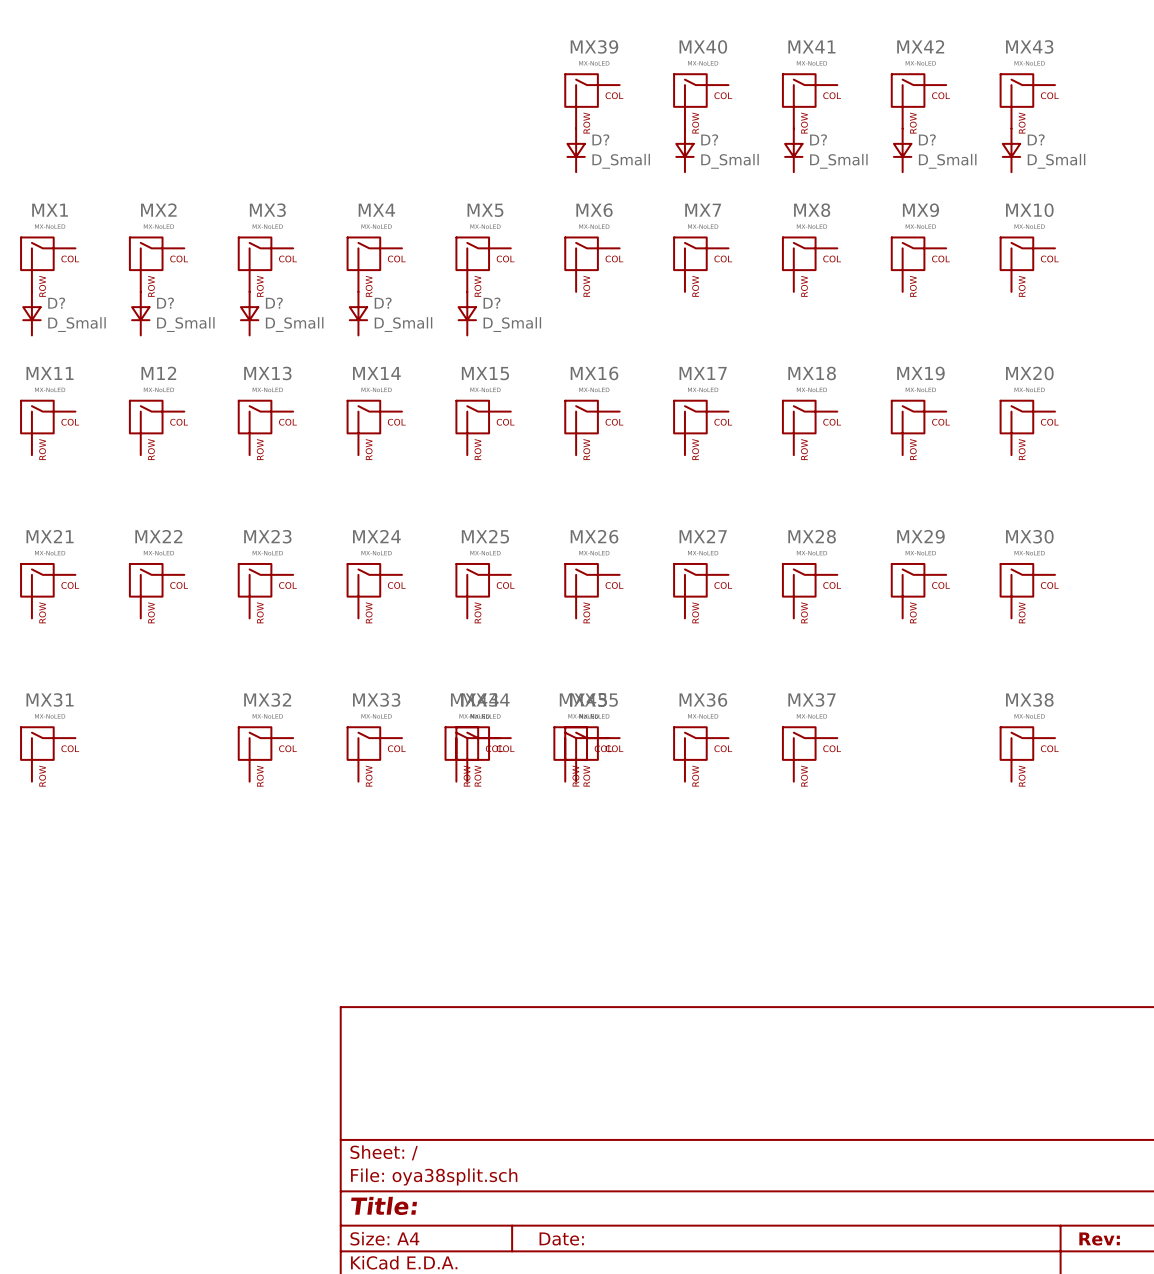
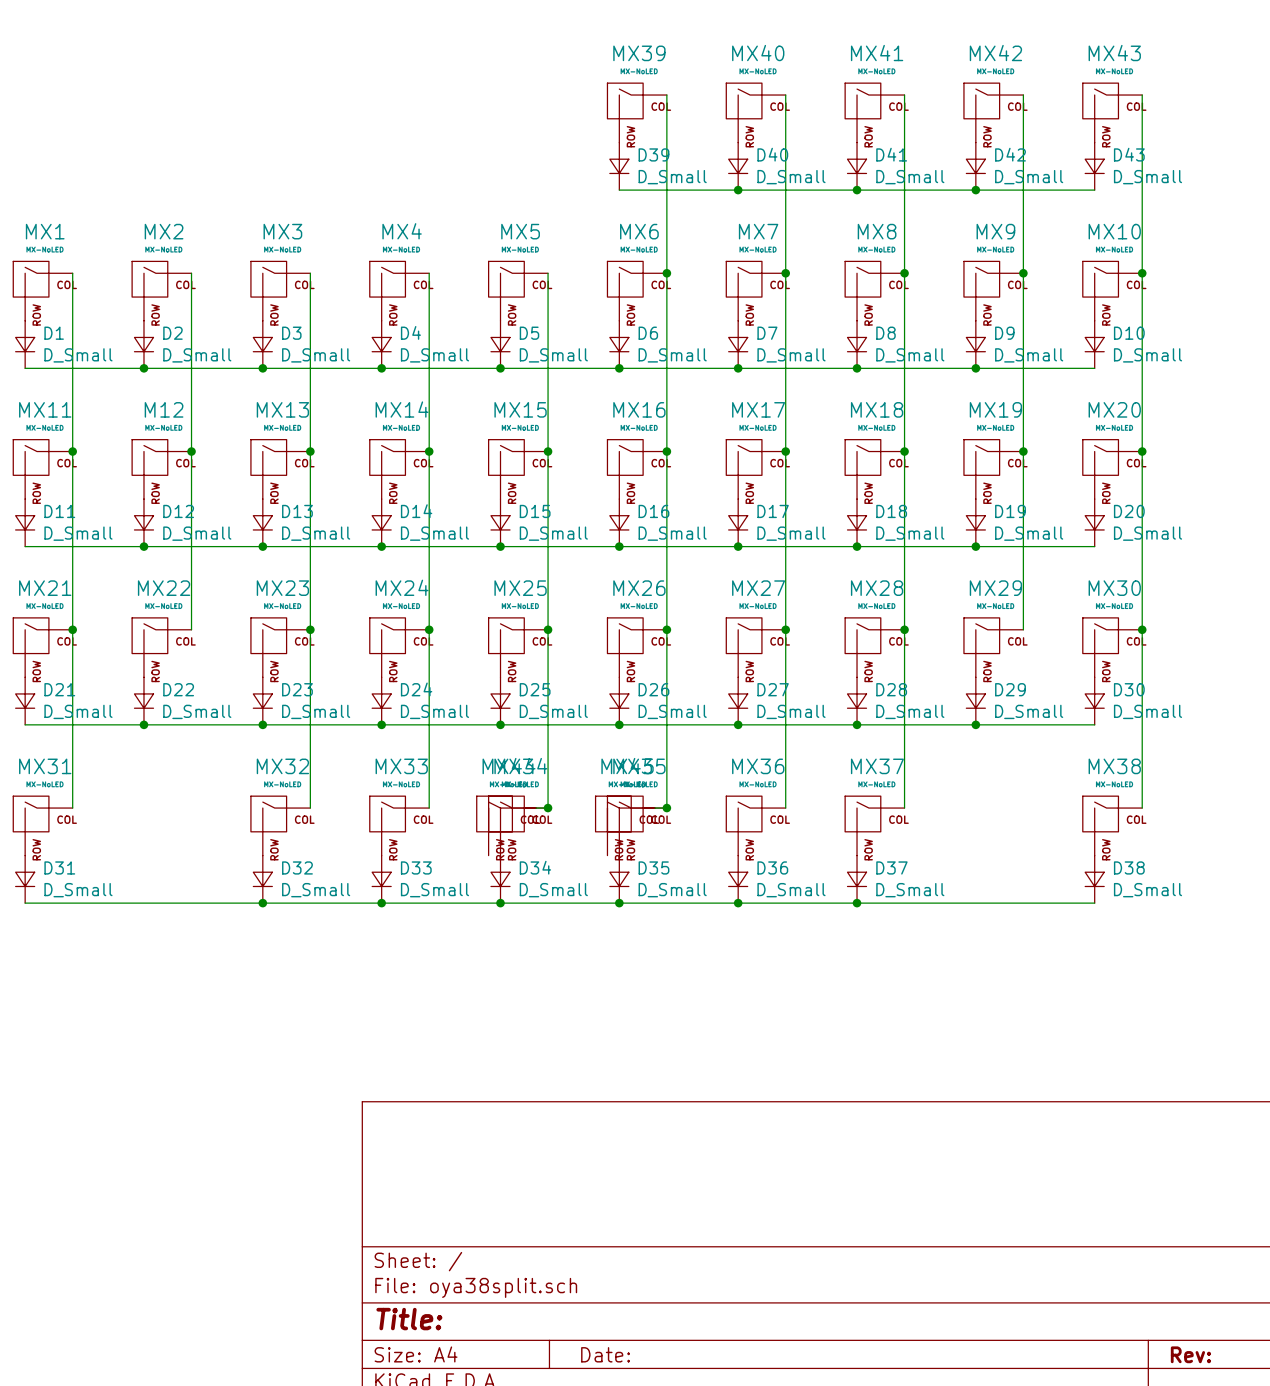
wire: none -> (666, 95) (666, 808) (654, 808)
wire: none -> (785, 95) (785, 808)
wire: none -> (904, 95) (904, 808)
wire: none -> (1023, 95) (1023, 629)
wire: none -> (1142, 95) (1142, 808)
D? name: D? (600, 139) -> D39 (653, 154)
D? name: D? (709, 139) -> D40 (772, 154)
D? name: D? (818, 139) -> D41 (891, 154)
D? name: D? (927, 139) -> D42 (1010, 154)
D? name: D? (1036, 139) -> D43 (1129, 154)
wire: none -> (619, 190) (1094, 190)
junction: none -> (738, 190)
junction: none -> (857, 190)
junction: none -> (975, 190)
wire: none -> (72, 273) (72, 808)
wire: none -> (191, 273) (191, 629)
wire: none -> (310, 273) (310, 808)
wire: none -> (429, 273) (429, 808)
wire: none -> (548, 273) (548, 808) (536, 808)
junction: none -> (666, 273)
junction: none -> (785, 273)
junction: none -> (904, 273)
junction: none -> (1023, 273)
junction: none -> (1142, 273)
D? name: D? (56, 303) -> D1 (54, 333)
D? name: D? (165, 303) -> D2 (172, 333)
D? name: D? (274, 303) -> D3 (291, 333)
D? name: D? (383, 303) -> D4 (410, 332)
D? name: D? (492, 303) -> D5 (529, 333)
D6: none -> D_Small (619, 344)
D7: none -> D_Small (738, 344)
D8: none -> D_Small (857, 344)
D9: none -> D_Small (975, 344)
D10: none -> D_Small (1094, 344)
wire: none -> (25, 368) (1094, 368)
junction: none -> (143, 368)
junction: none -> (262, 368)
junction: none -> (381, 368)
junction: none -> (500, 368)
junction: none -> (619, 368)
junction: none -> (738, 368)
junction: none -> (857, 368)
junction: none -> (975, 368)
junction: none -> (72, 451)
junction: none -> (191, 451)
junction: none -> (310, 451)
junction: none -> (429, 451)
junction: none -> (548, 451)
junction: none -> (666, 451)
junction: none -> (785, 451)
junction: none -> (904, 451)
junction: none -> (1023, 451)
junction: none -> (1142, 451)
D11: none -> D_Small (25, 522)
D12: none -> D_Small (143, 522)
D13: none -> D_Small (262, 522)
D14: none -> D_Small (381, 522)
D15: none -> D_Small (500, 522)
D16: none -> D_Small (619, 522)
D17: none -> D_Small (738, 522)
D18: none -> D_Small (857, 522)
D19: none -> D_Small (975, 522)
D20: none -> D_Small (1094, 522)
wire: none -> (25, 546) (1094, 546)
junction: none -> (143, 546)
junction: none -> (262, 546)
junction: none -> (381, 546)
junction: none -> (500, 546)
junction: none -> (619, 546)
junction: none -> (738, 546)
junction: none -> (857, 546)
junction: none -> (975, 546)
junction: none -> (72, 629)
junction: none -> (310, 629)
junction: none -> (429, 629)
junction: none -> (548, 629)
junction: none -> (666, 629)
junction: none -> (785, 629)
junction: none -> (904, 629)
junction: none -> (1142, 629)
D21: none -> D_Small (25, 701)
D22: none -> D_Small (143, 701)
D23: none -> D_Small (262, 701)
D24: none -> D_Small (381, 701)
D25: none -> D_Small (500, 701)
D26: none -> D_Small (619, 701)
D27: none -> D_Small (738, 701)
D28: none -> D_Small (857, 701)
D29: none -> D_Small (975, 701)
D30: none -> D_Small (1094, 701)
wire: none -> (25, 724) (1094, 724)
junction: none -> (143, 724)
junction: none -> (262, 724)
junction: none -> (381, 724)
junction: none -> (500, 724)
junction: none -> (619, 724)
junction: none -> (738, 724)
junction: none -> (857, 724)
junction: none -> (975, 724)
junction: none -> (548, 808)
junction: none -> (666, 808)
D31: none -> D_Small (25, 879)
D32: none -> D_Small (262, 879)
D33: none -> D_Small (381, 879)
D34: none -> D_Small (500, 879)
D35: none -> D_Small (619, 879)
D36: none -> D_Small (738, 879)
D37: none -> D_Small (857, 879)
D38: none -> D_Small (1094, 879)
wire: none -> (25, 903) (1094, 903)
junction: none -> (262, 903)
junction: none -> (381, 903)
junction: none -> (500, 903)
junction: none -> (619, 903)
junction: none -> (738, 903)
junction: none -> (857, 903)

